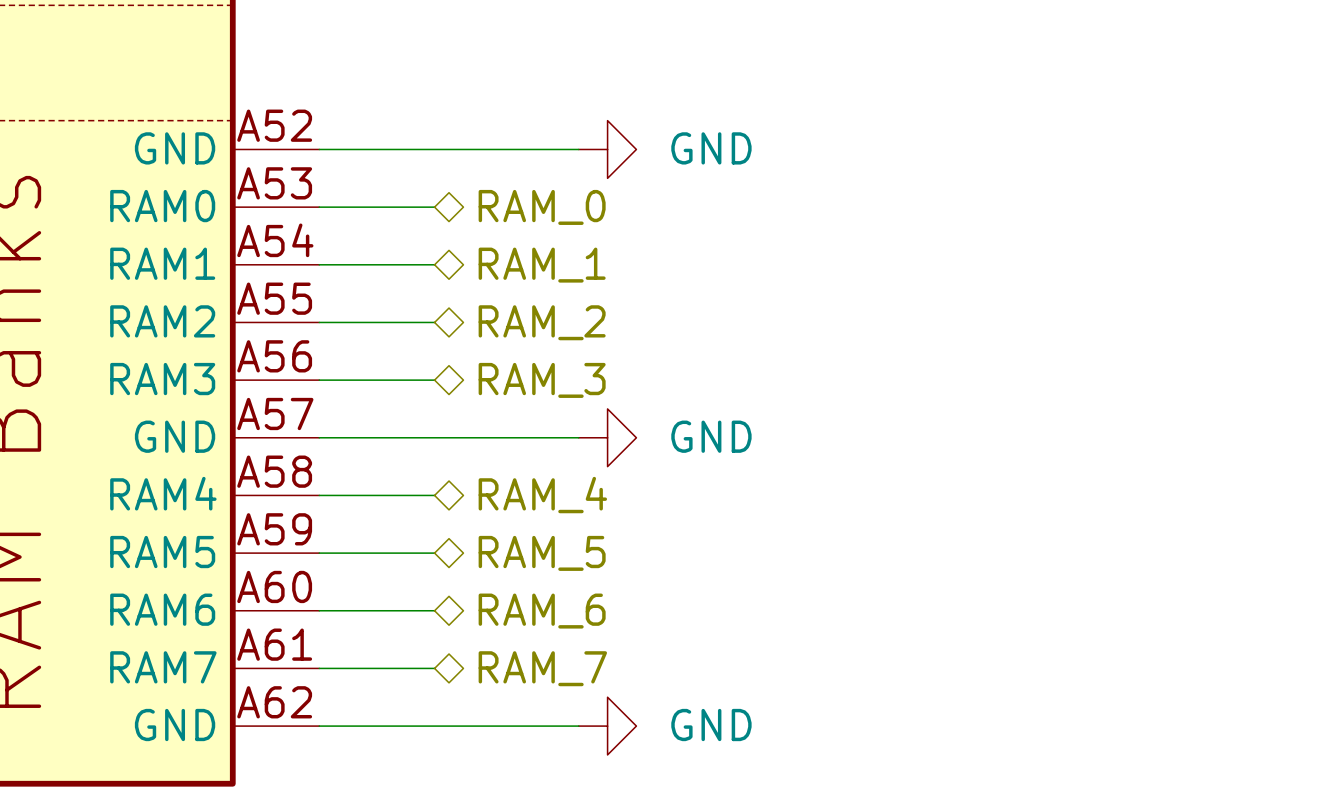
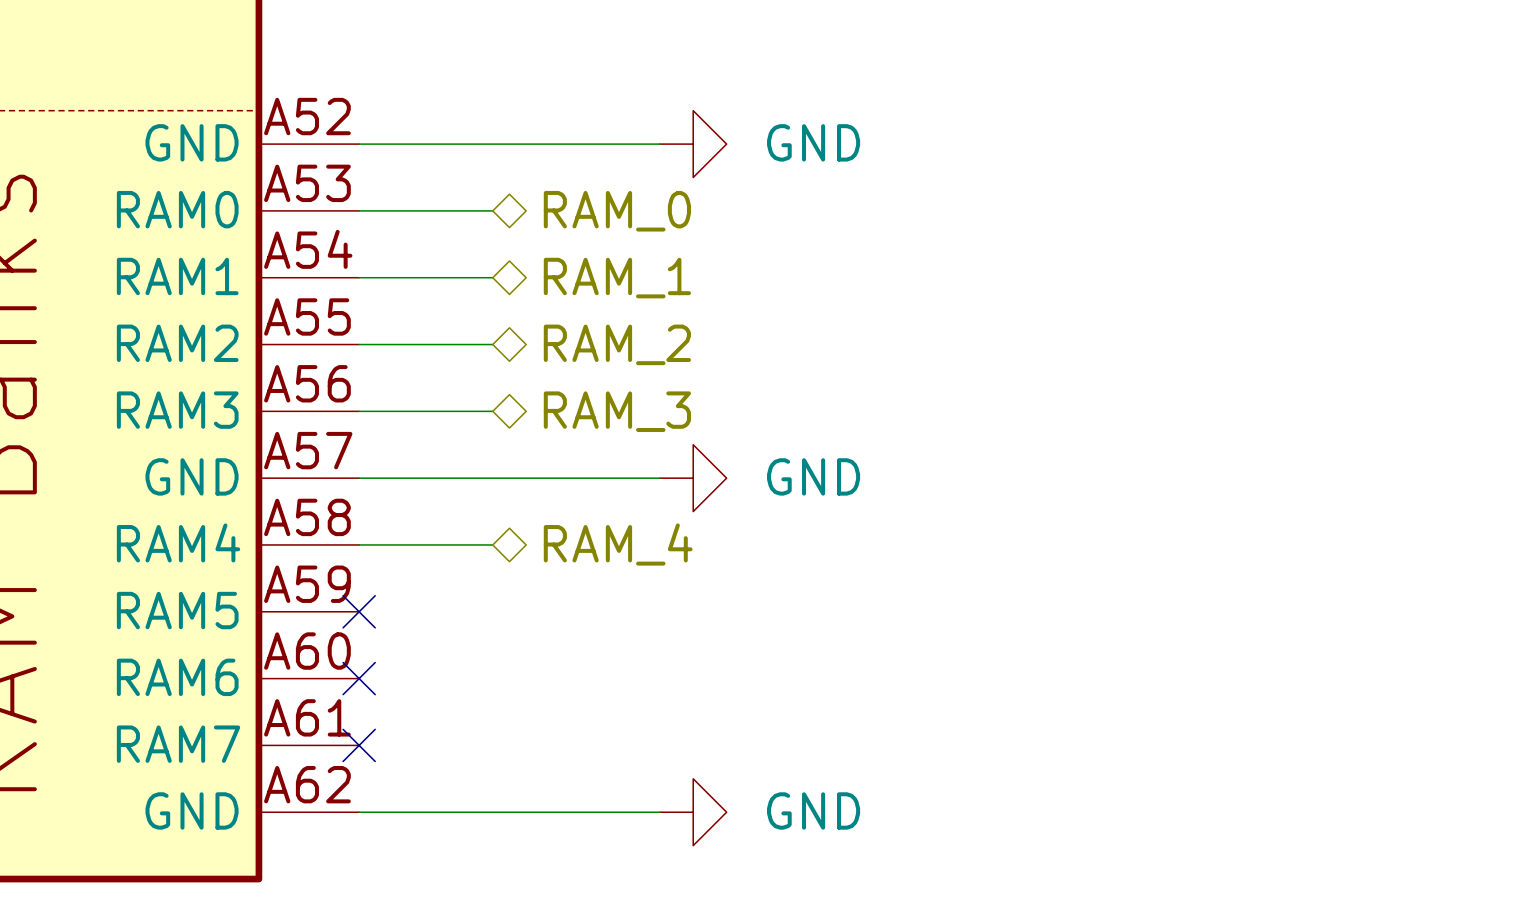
wire: (319, 553) (434, 553) -> none
no-connect mark: none -> (359, 611)
hierarchical label: RAM_5 (542, 553) -> none
wire: (319, 610) (434, 610) -> none
no-connect mark: none -> (359, 678)
hierarchical label: RAM_6 (542, 611) -> none
wire: (319, 668) (434, 668) -> none
no-connect mark: none -> (359, 745)
hierarchical label: RAM_7 (542, 668) -> none

